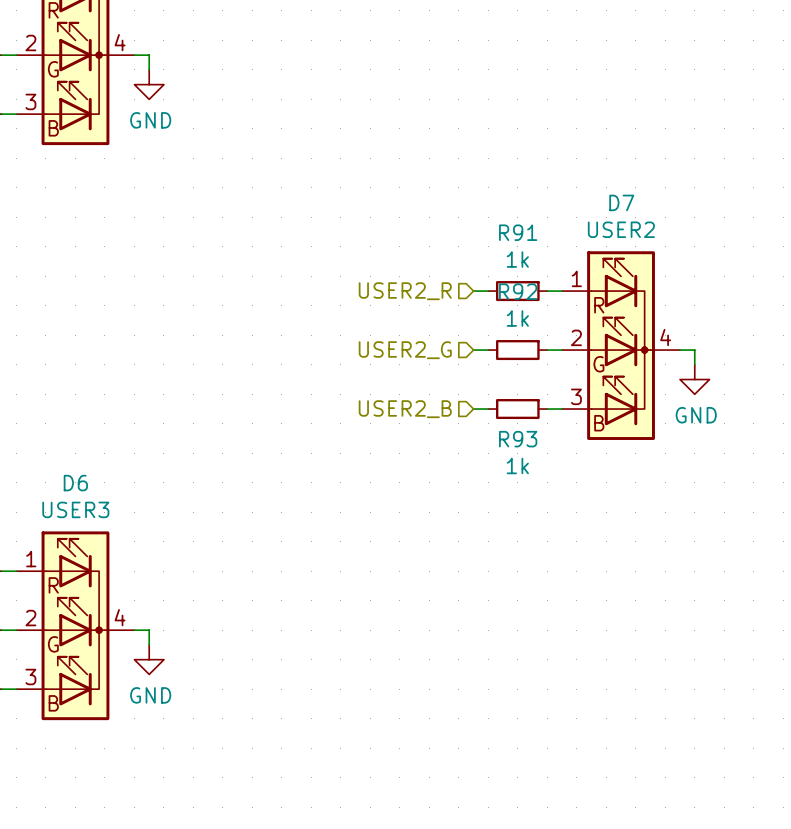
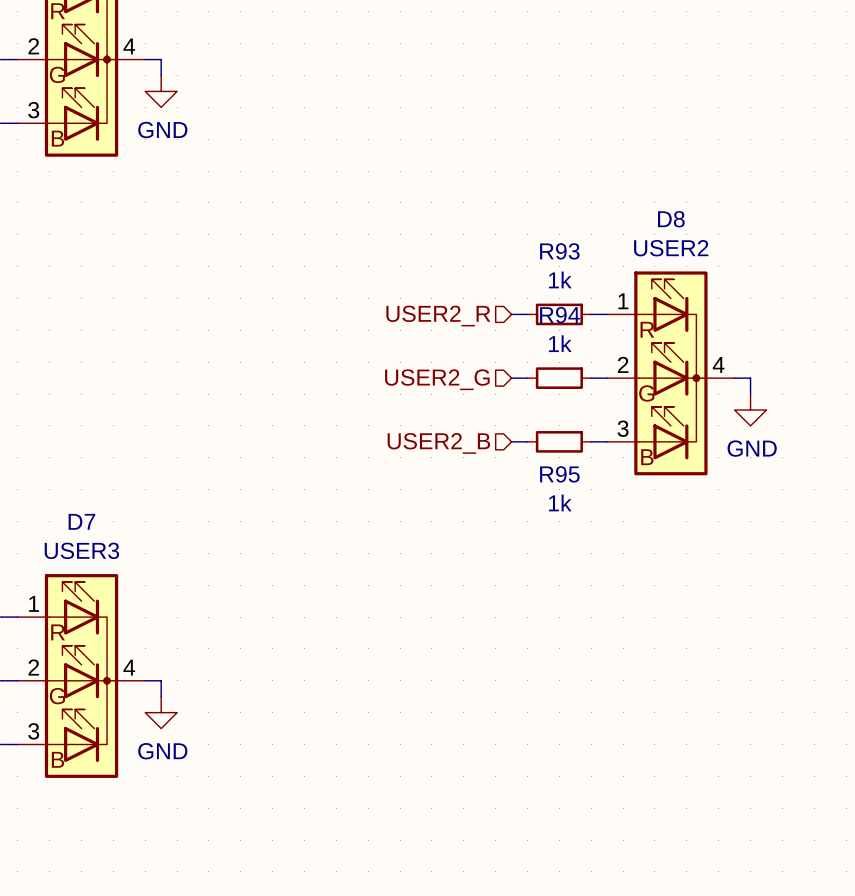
D7 name: D7 (621, 202) -> D8 (671, 219)
R91 name: R91 (518, 232) -> R93 (559, 251)
R92 name: R92 (518, 291) -> R94 (560, 315)
R93 name: R93 (518, 439) -> R95 (559, 474)
D6 name: D6 (75, 483) -> D7 (81, 521)

